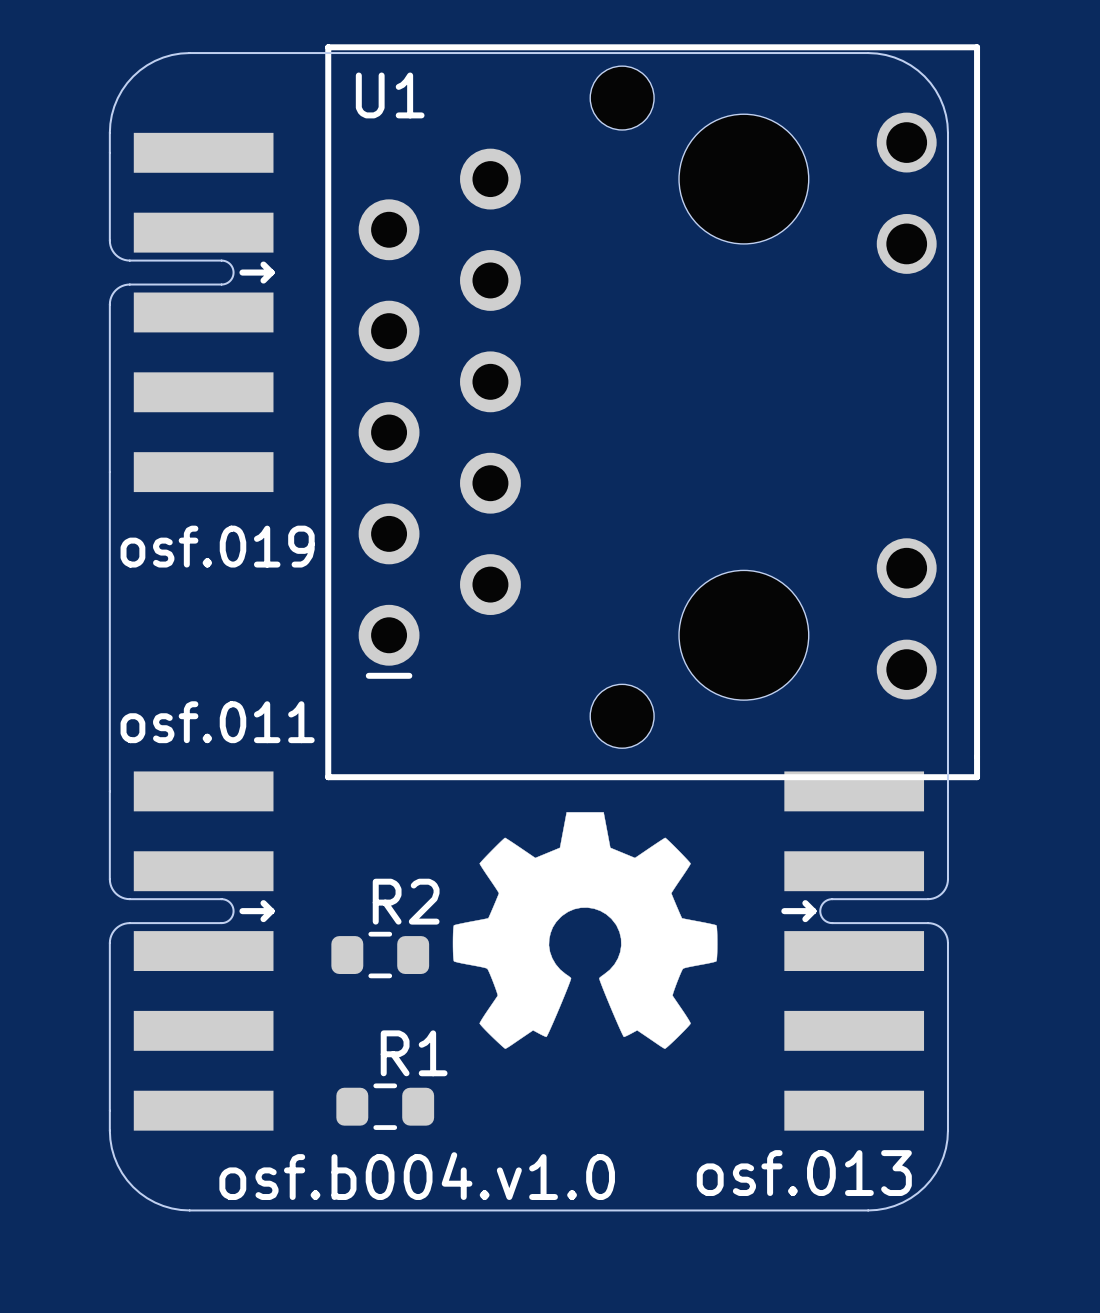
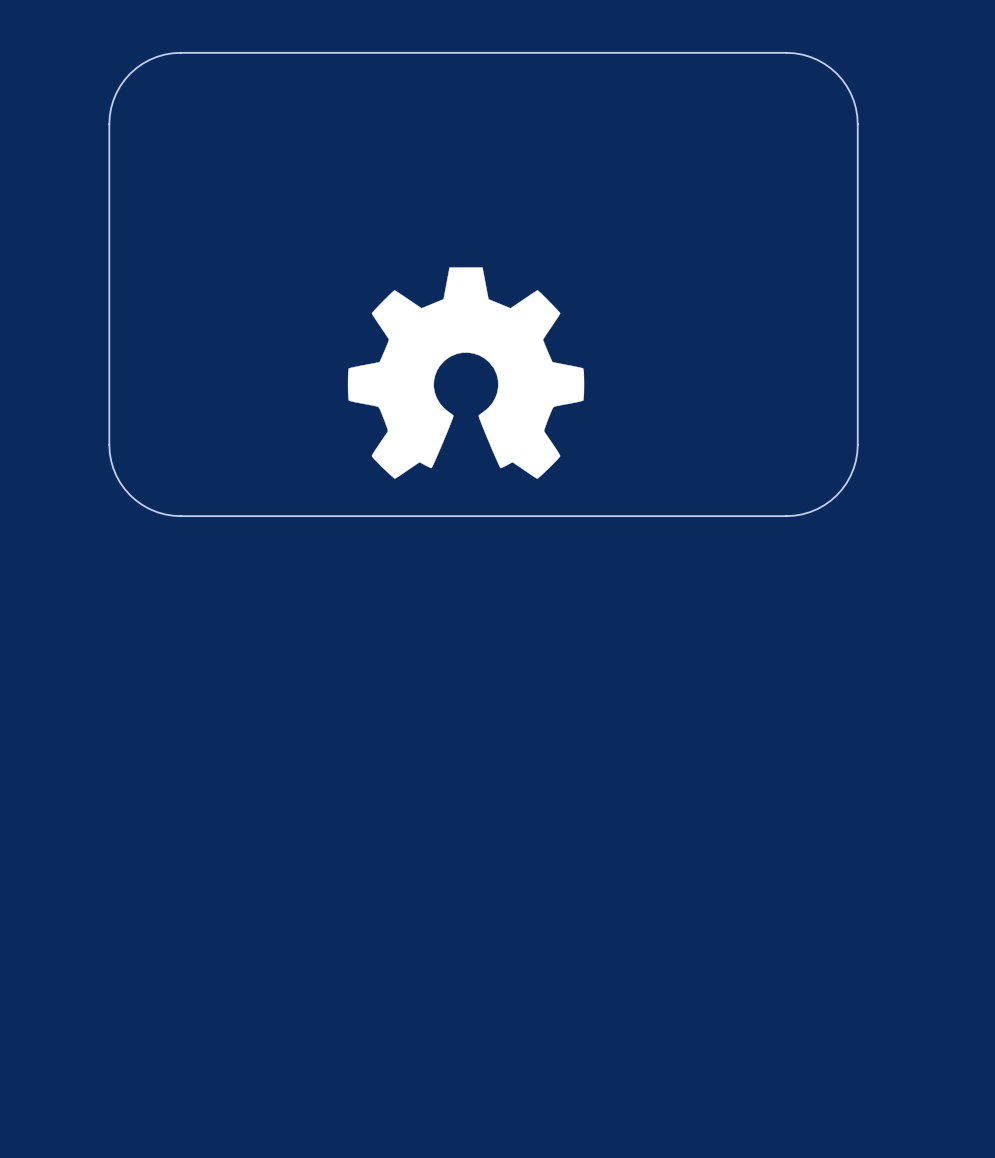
board edge: none -> (109, 141) (109, 427)
part: (191, 312) -> none
U1: (652, 412) -> none
board edge: (109, 492) (109, 791) -> (109, 444) (111, 460) (116, 475) (130, 495) (142, 505) (157, 512) (180, 516) (794, 515) (817, 509) (830, 500) (842, 489) (853, 468) (857, 444)
board edge: (947, 492) (947, 791) -> none
text: osf.019 (217, 546) -> none
text: osf.011 (217, 722) -> none
drawing position: (585, 930) -> (466, 373)
part: (191, 951) -> none
part: (865, 951) -> none
R2: (380, 955) -> none
R1: (385, 1106) -> none
board edge: (109, 1110) (111, 1148) (117, 1165) (127, 1180) (139, 1193) (155, 1202) (171, 1208) (189, 1210) (877, 1209) (902, 1202) (917, 1193) (930, 1180) (940, 1165) (945, 1148) (947, 1110) -> none
text: osf.013 (804, 1173) -> none
text: osf.b004.v1.0 (417, 1176) -> none

